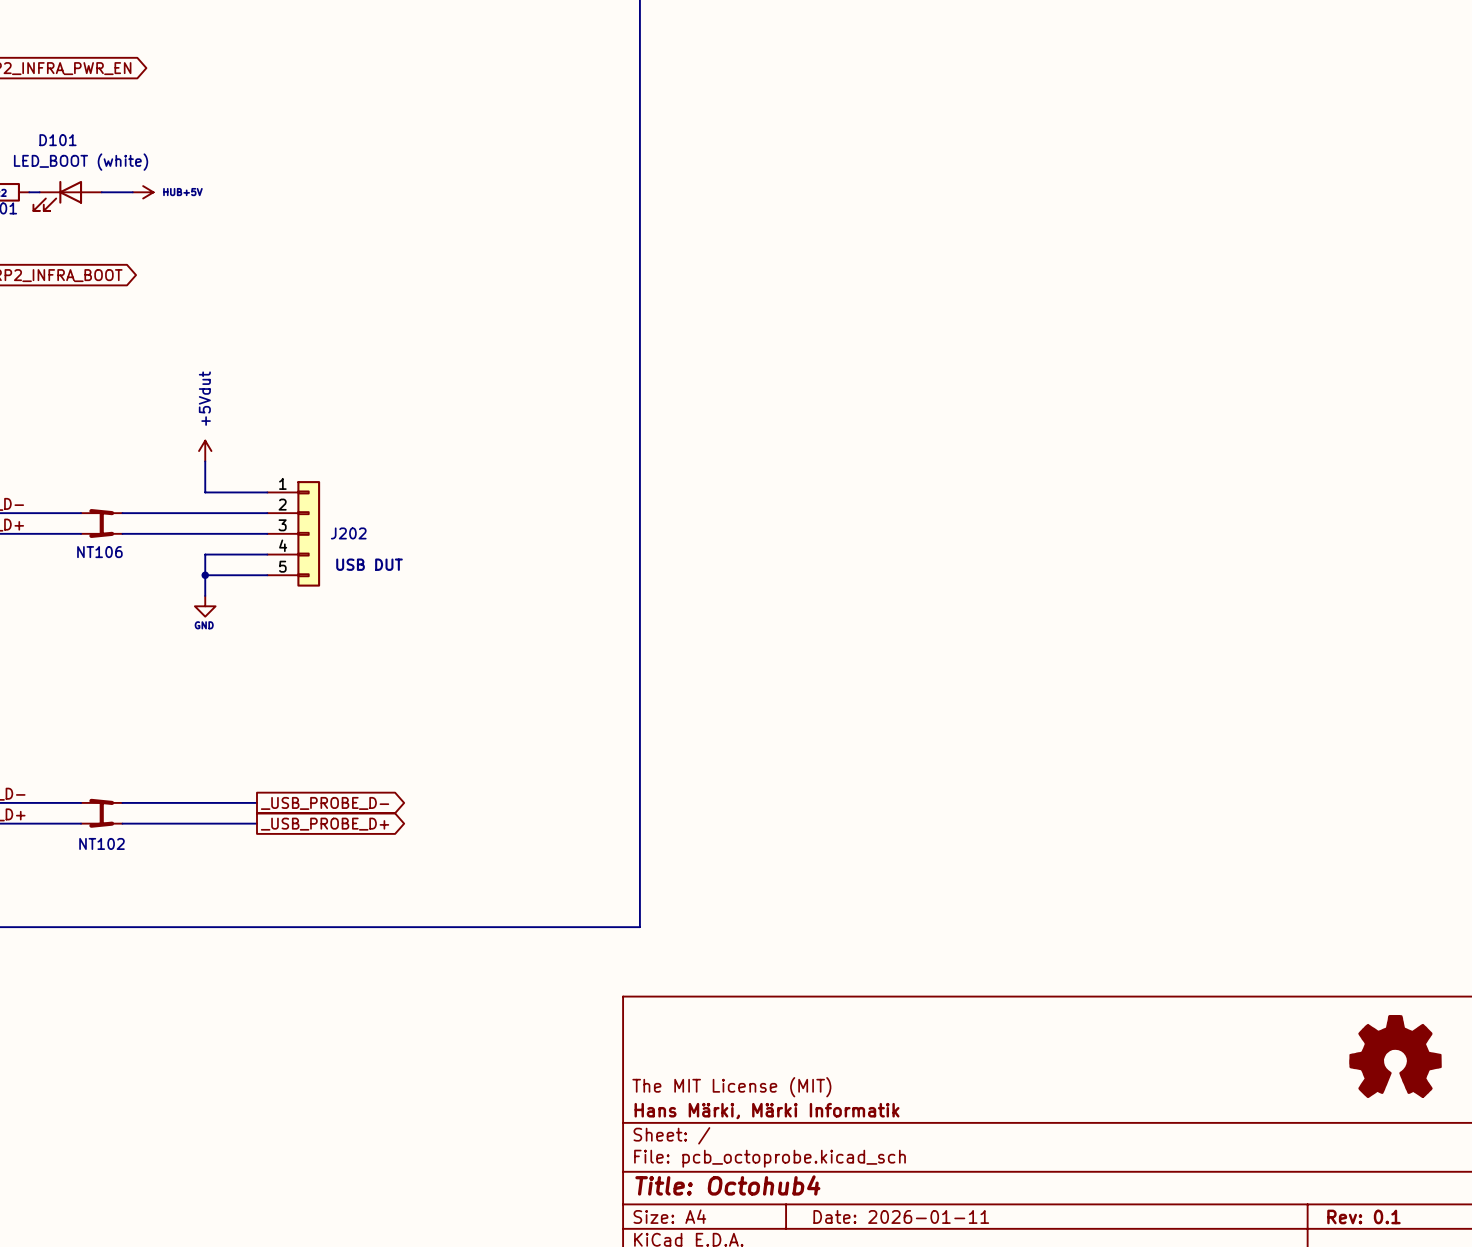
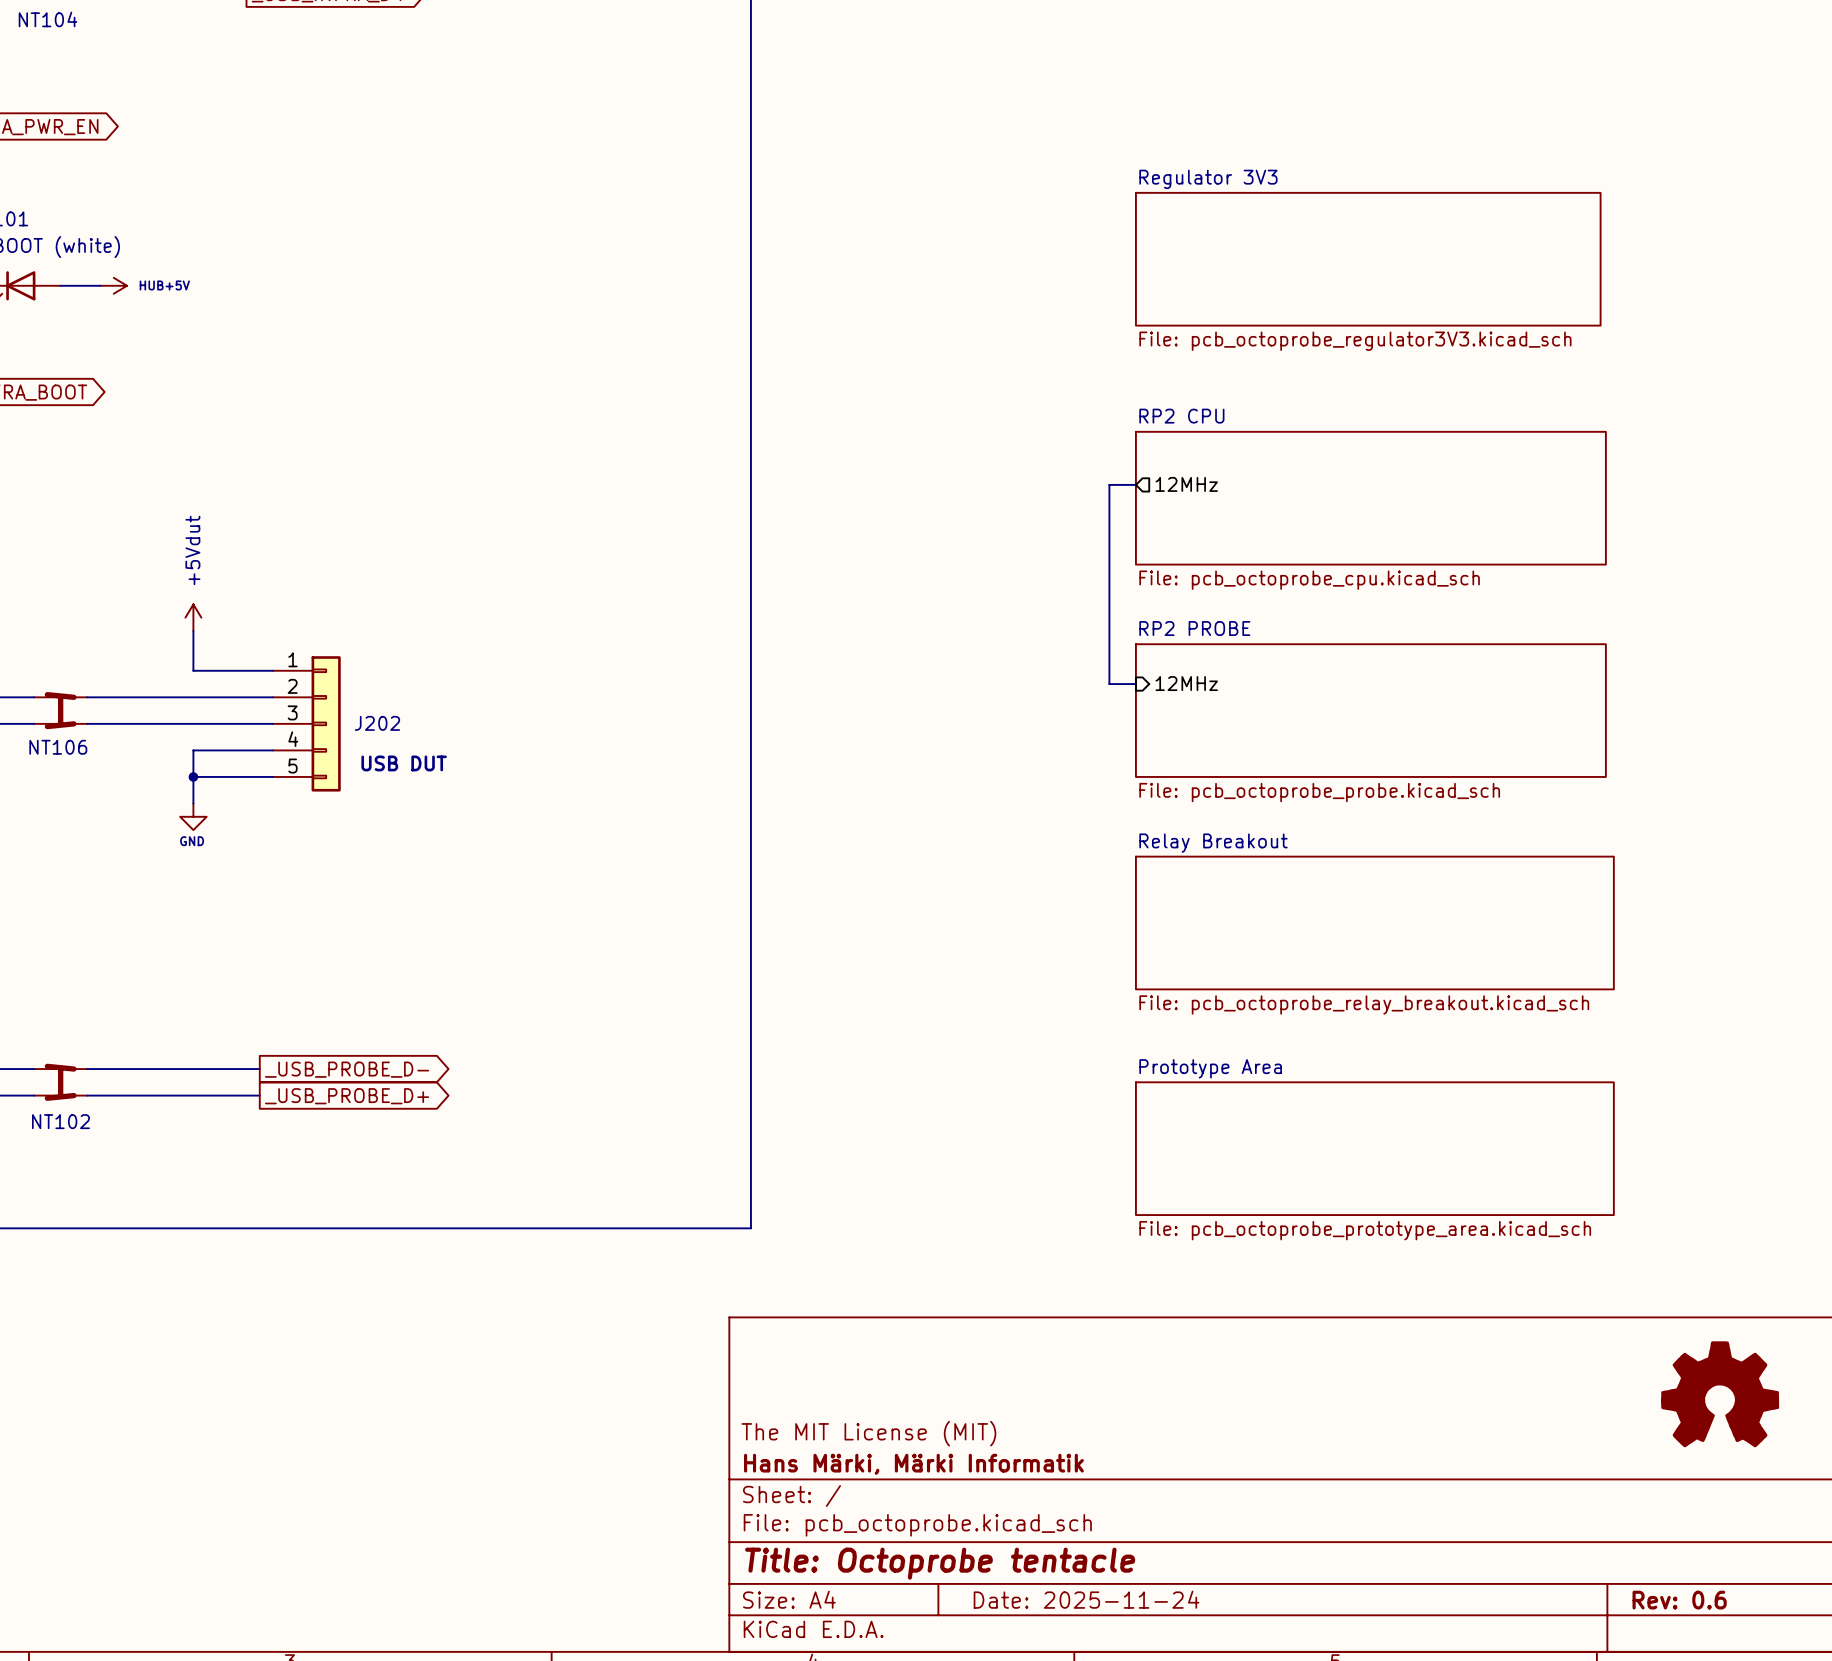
sheet Regulator 3V3: none -> File: pcb_octoprobe_regulator3V3.kicad_sch (1368, 259)
wire: none -> (1135, 484) (1109, 484) (1109, 684) (1135, 684)
sheet pin: none -> 12MHz (1186, 484)
sheet RP2 CPU: none -> File: pcb_octoprobe_cpu.kicad_sch (1370, 498)
sheet pin: none -> 12MHz (1186, 683)
sheet RP2 PROBE: none -> File: pcb_octoprobe_probe.kicad_sch (1370, 710)
sheet Relay Breakout: none -> File: pcb_octoprobe_relay_breakout.kicad_sch (1374, 923)
sheet Prototype Area: none -> File: pcb_octoprobe_prototype_area.kicad_sch (1374, 1148)
title block: Title: Octohub4 (727, 1185) -> Title: Octoprobe tentacle (940, 1563)
title block: Date: 2026-01-11 (901, 1216) -> Date: 2025-11-24 (1086, 1599)
title block: Rev: 0.1 (1363, 1216) -> Rev: 0.6 (1679, 1600)

